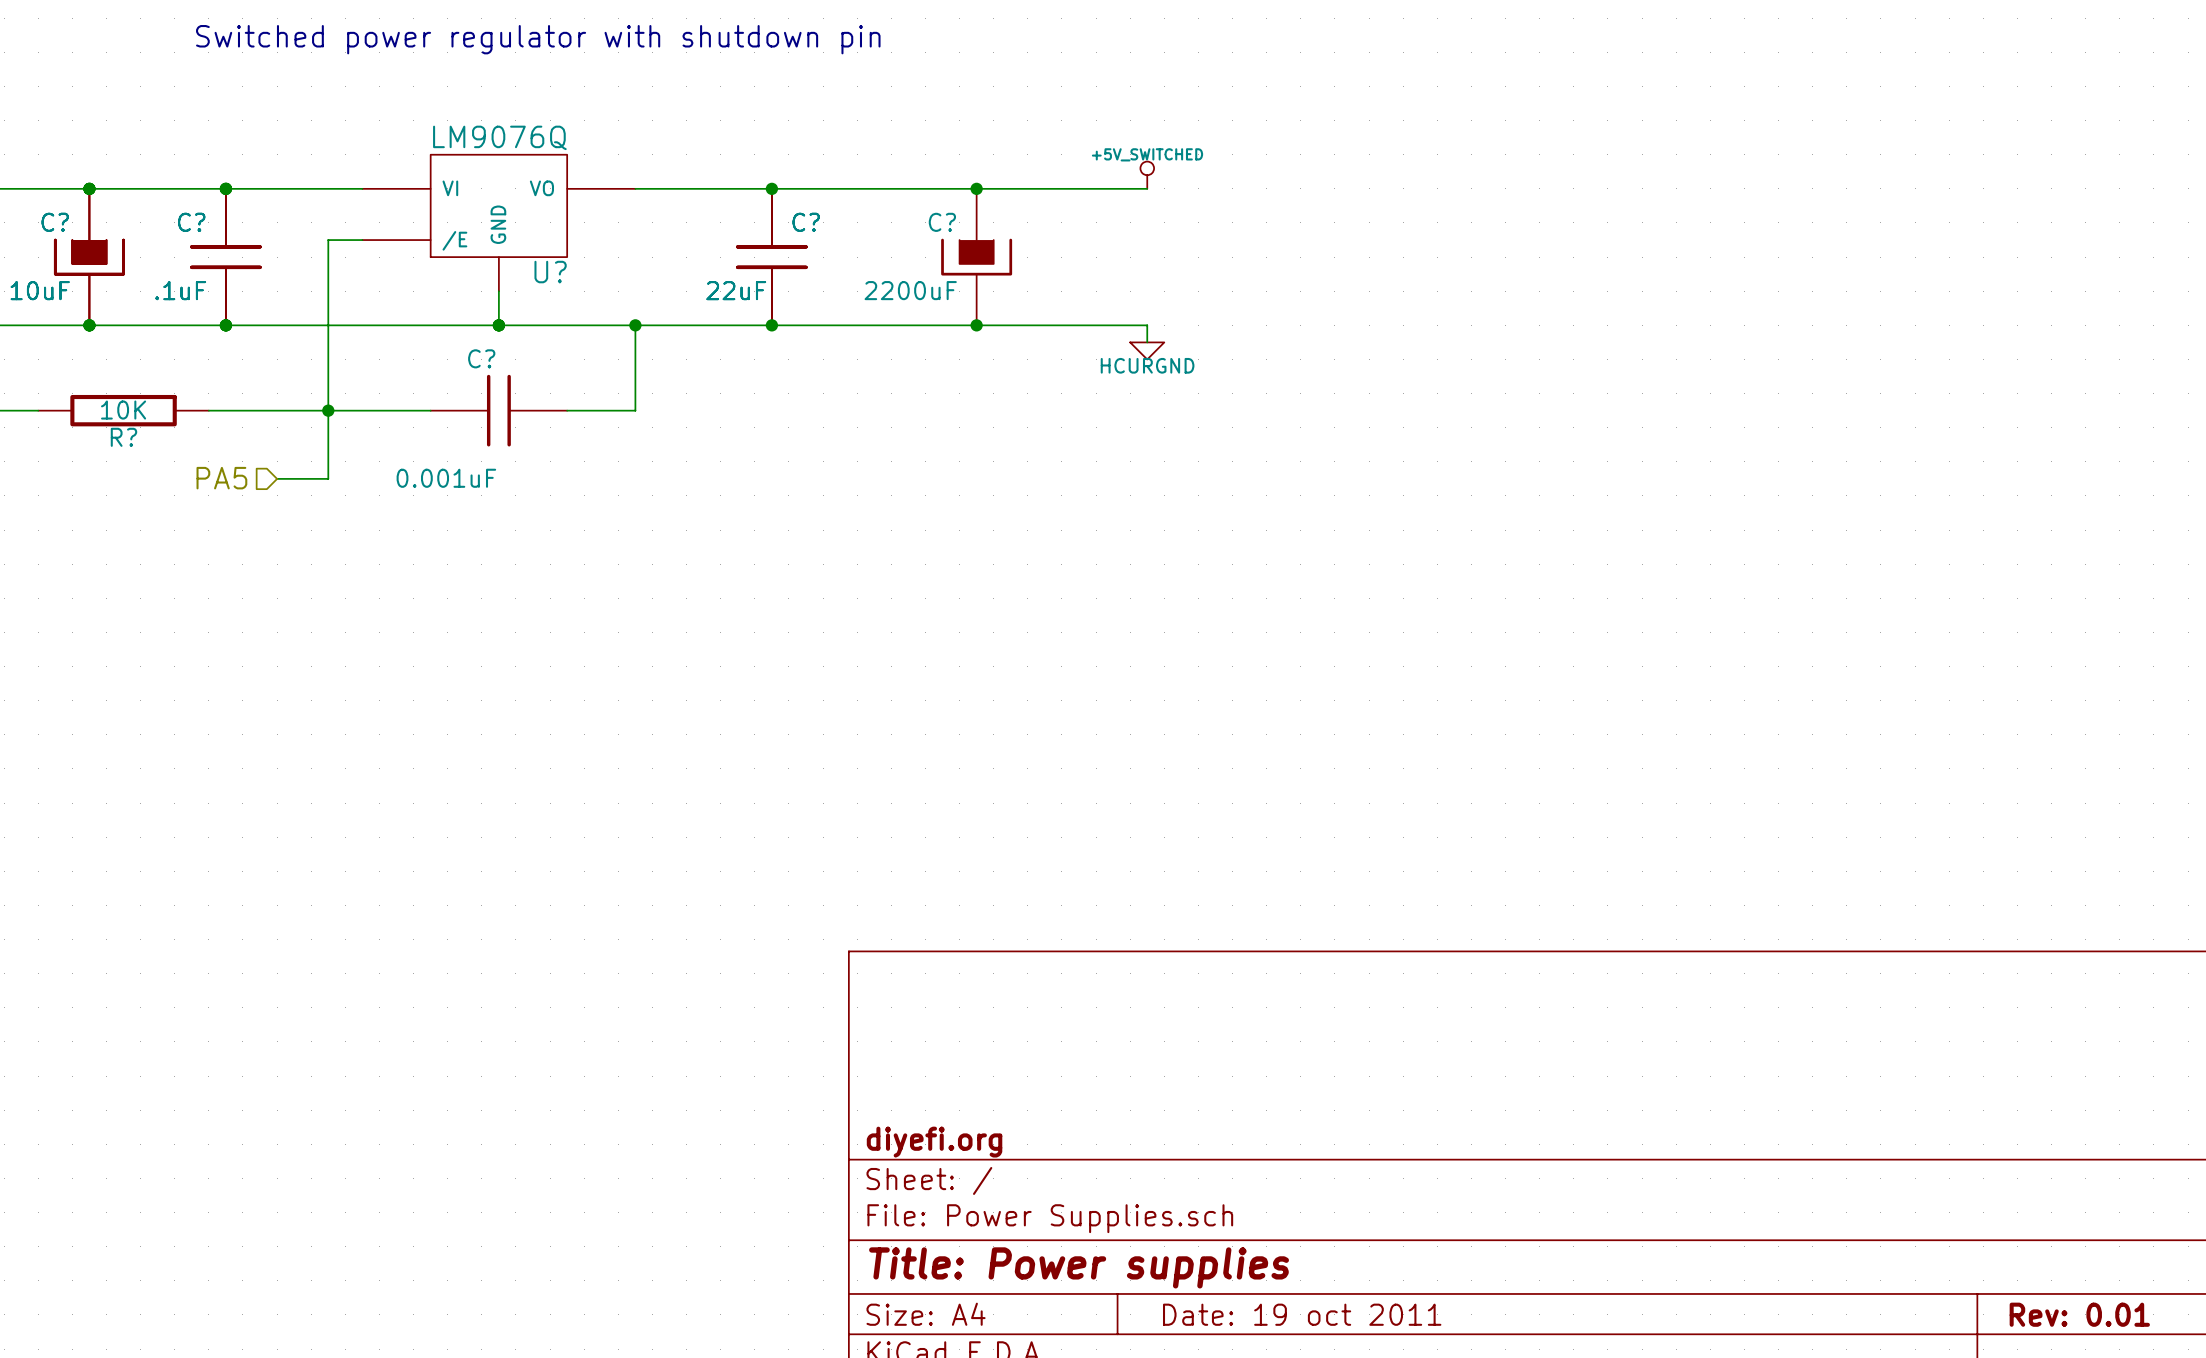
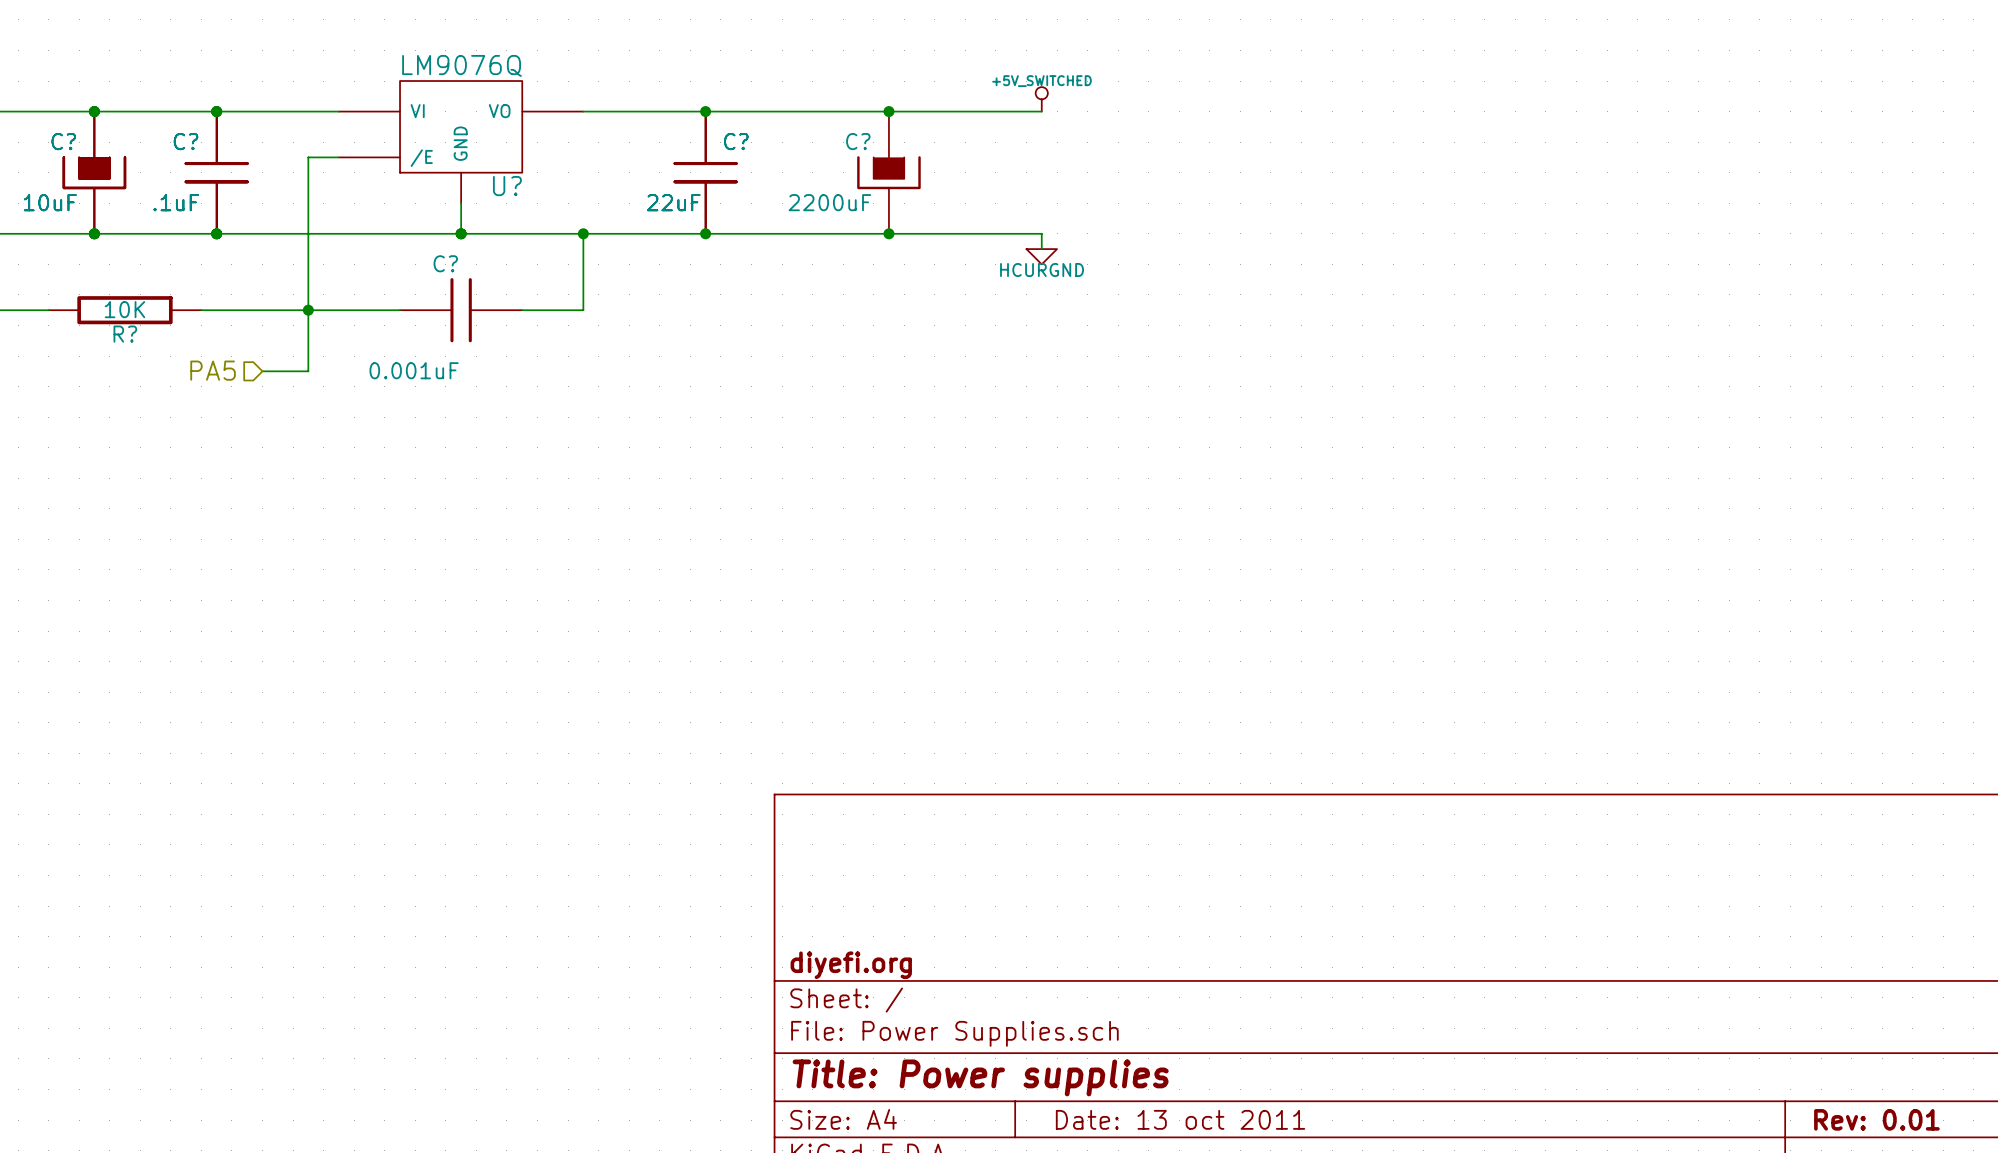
title block: Date: 19 oct 2011 (1302, 1314) -> Date: 13 oct 2011 (1180, 1119)

